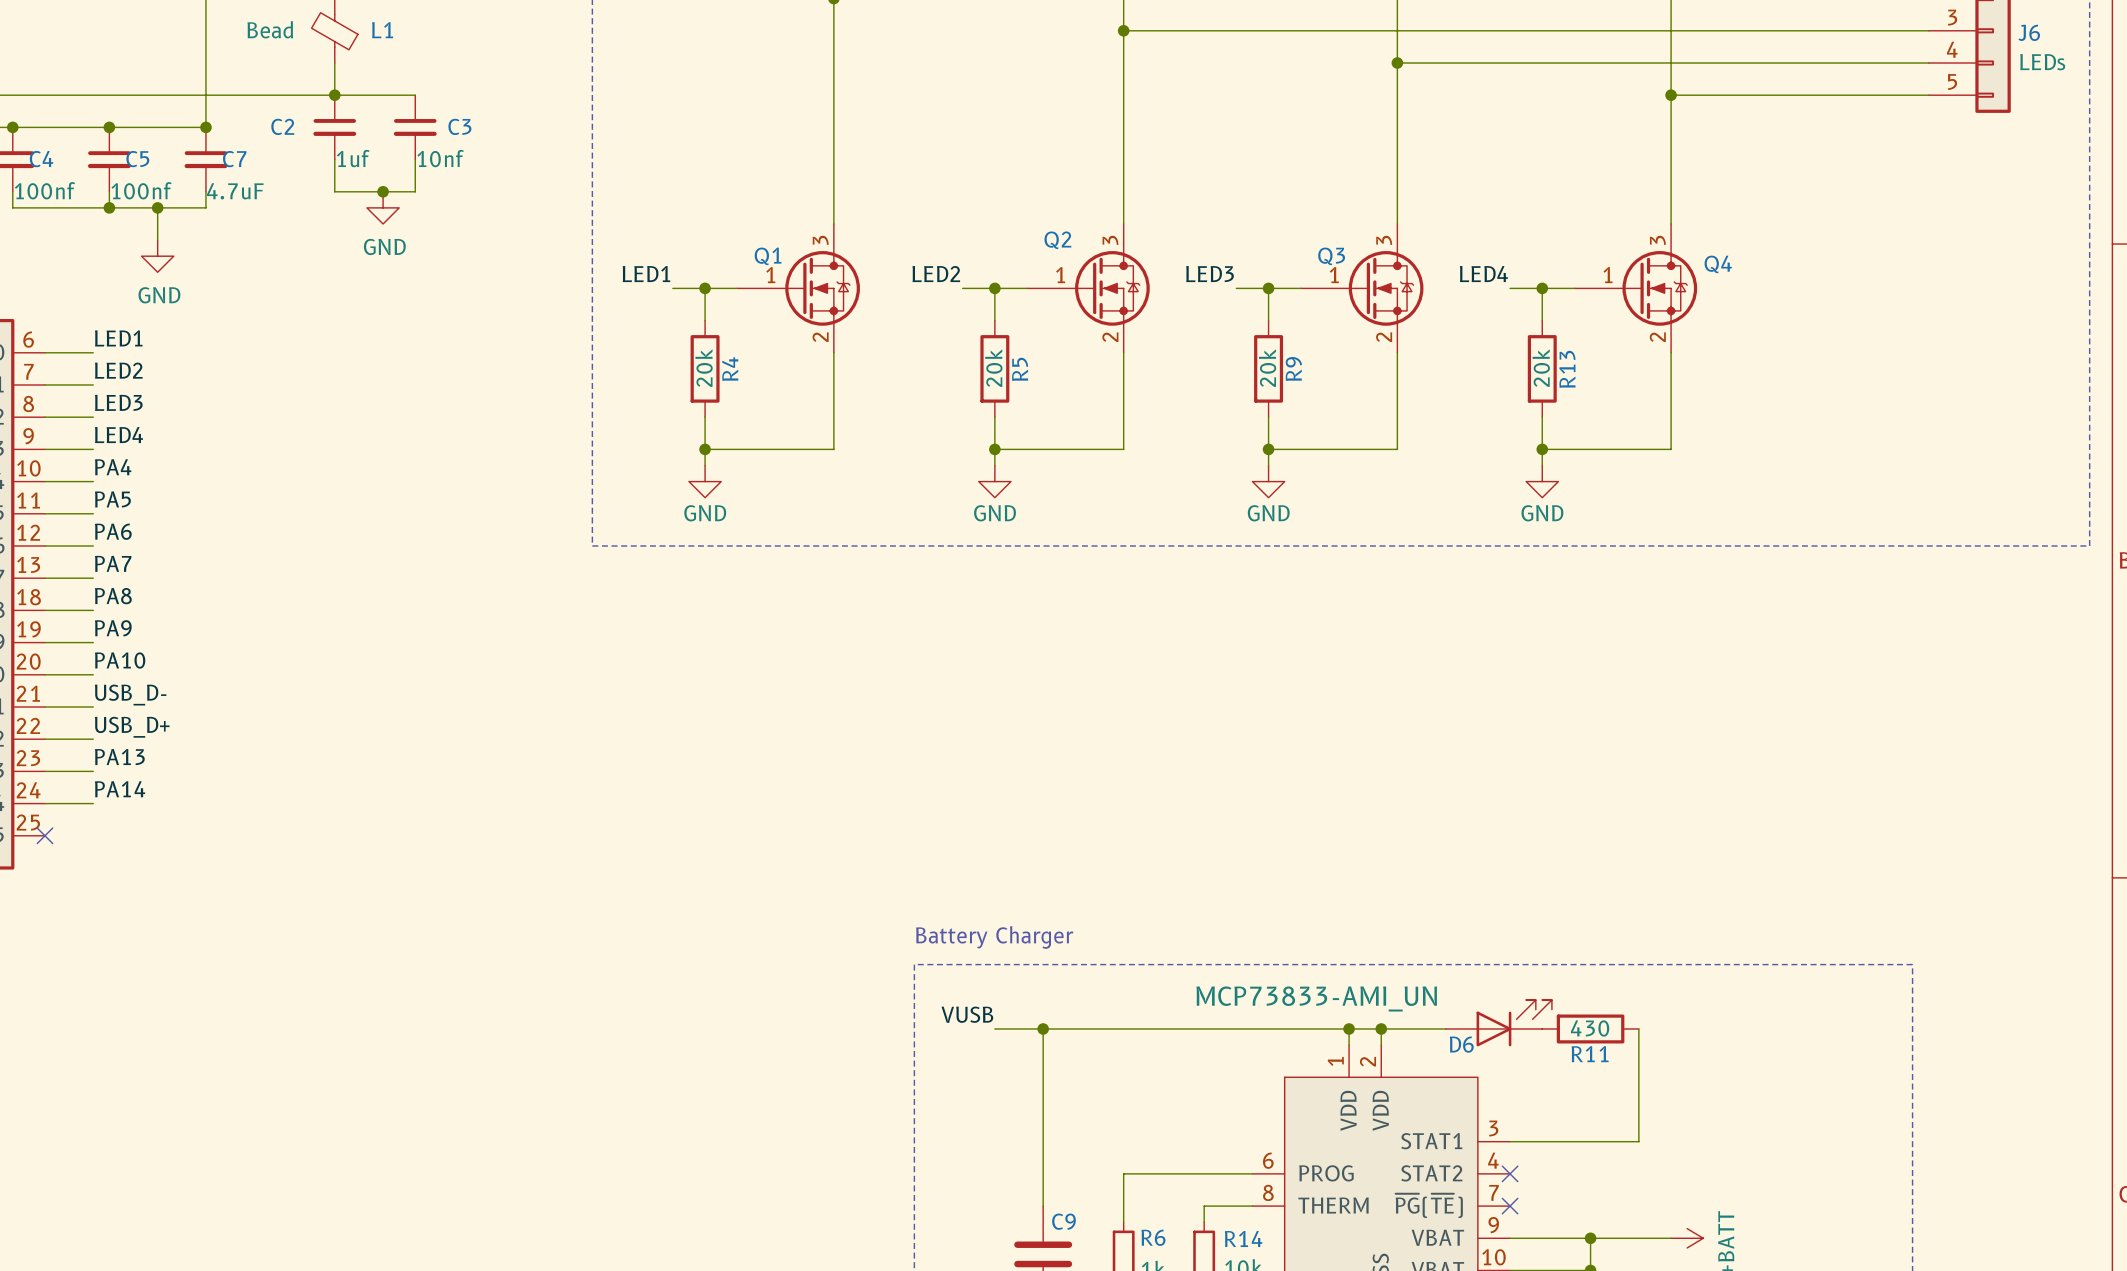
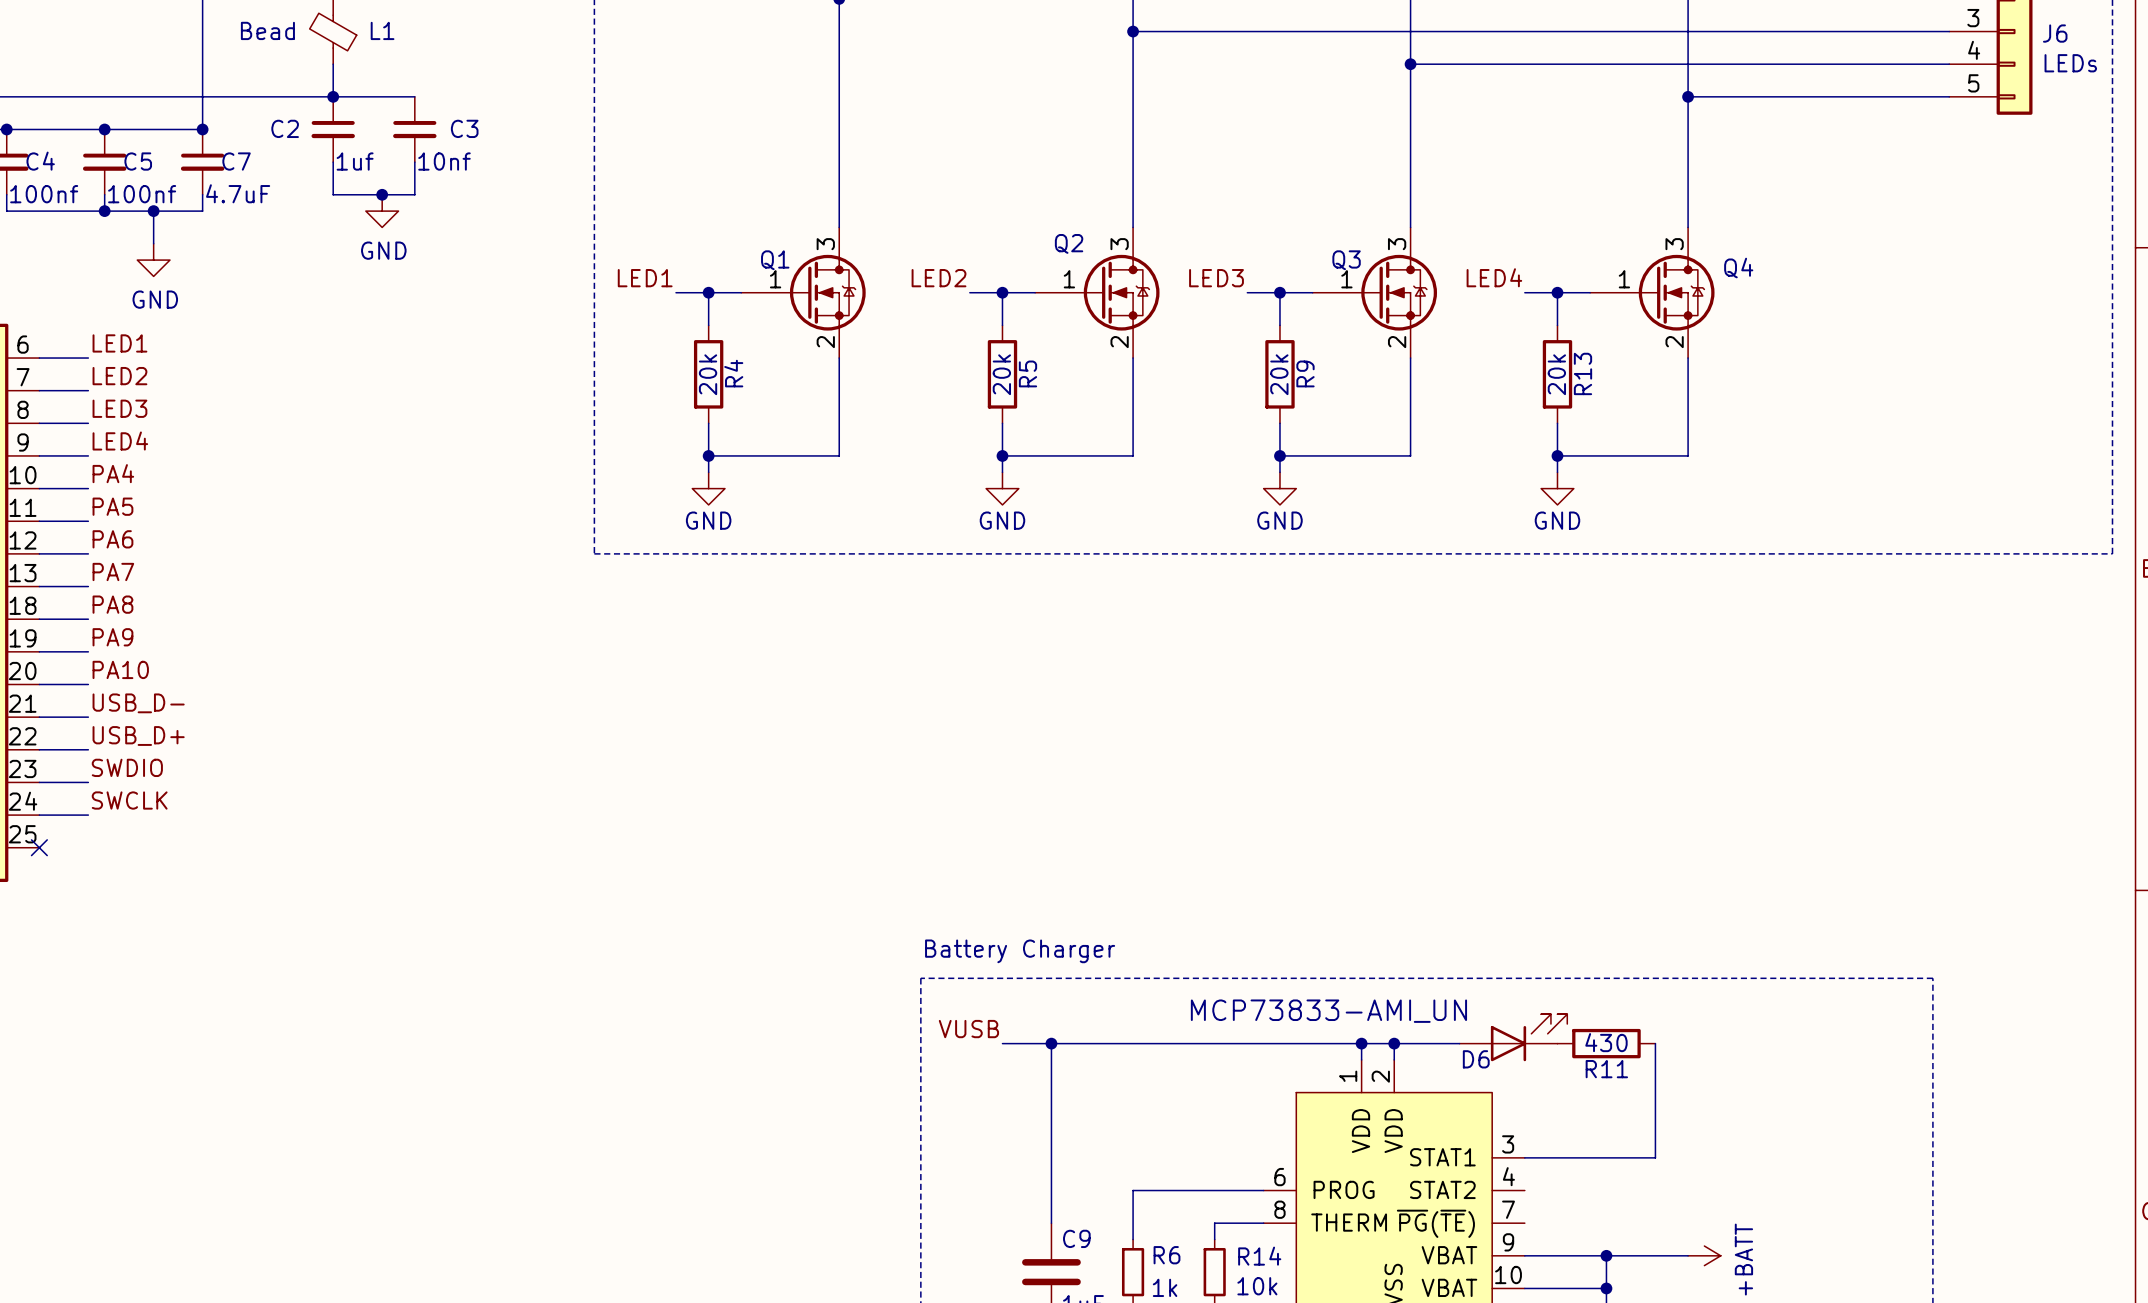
label: PA13 (119, 757) -> SWDIO (127, 767)
label: PA14 (120, 789) -> SWCLK (129, 800)
no-connect mark: (1510, 1173) -> none
no-connect mark: (1510, 1206) -> none

